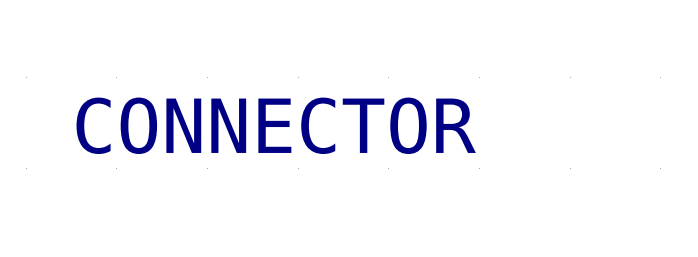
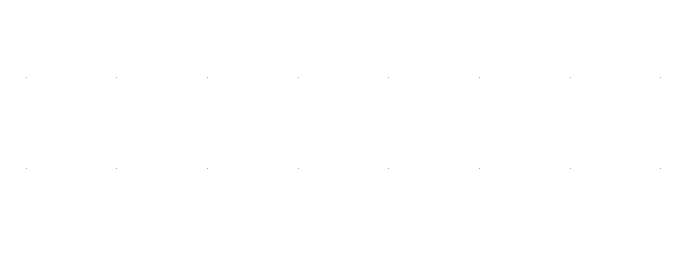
text: CONNECTOR (276, 125) -> none

